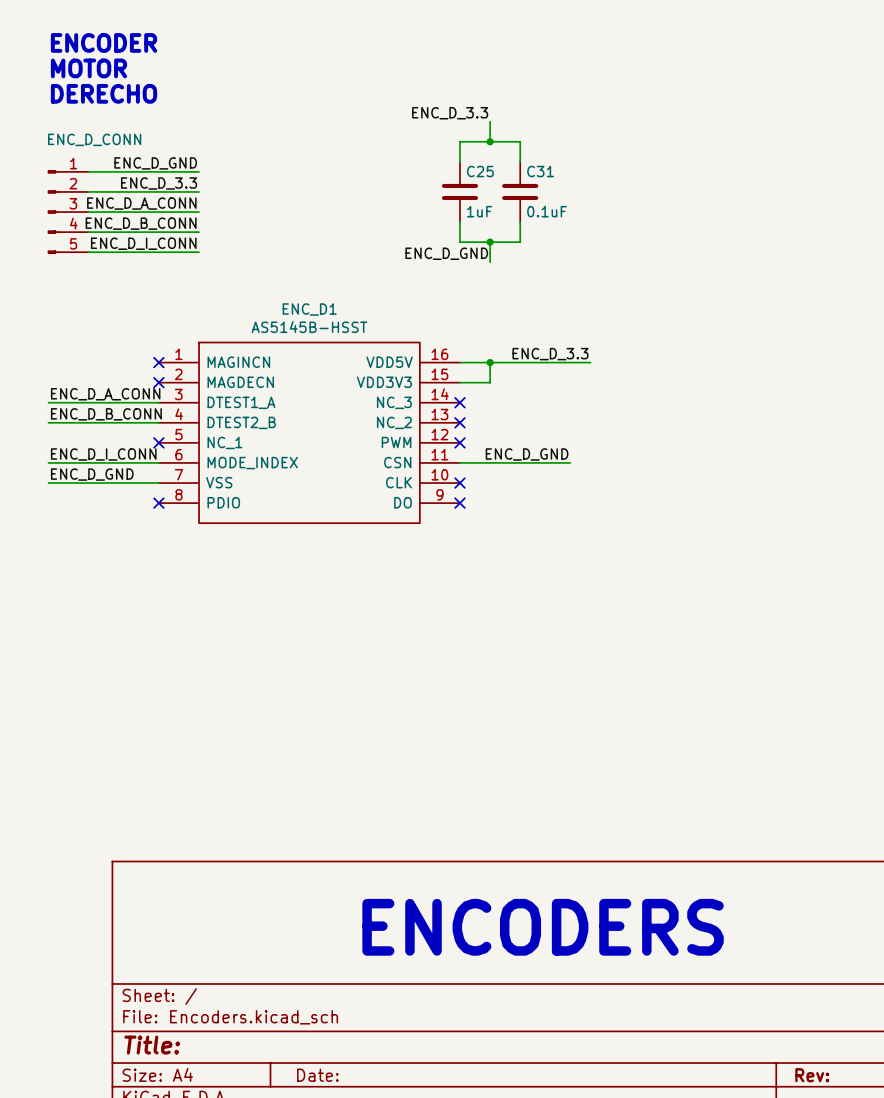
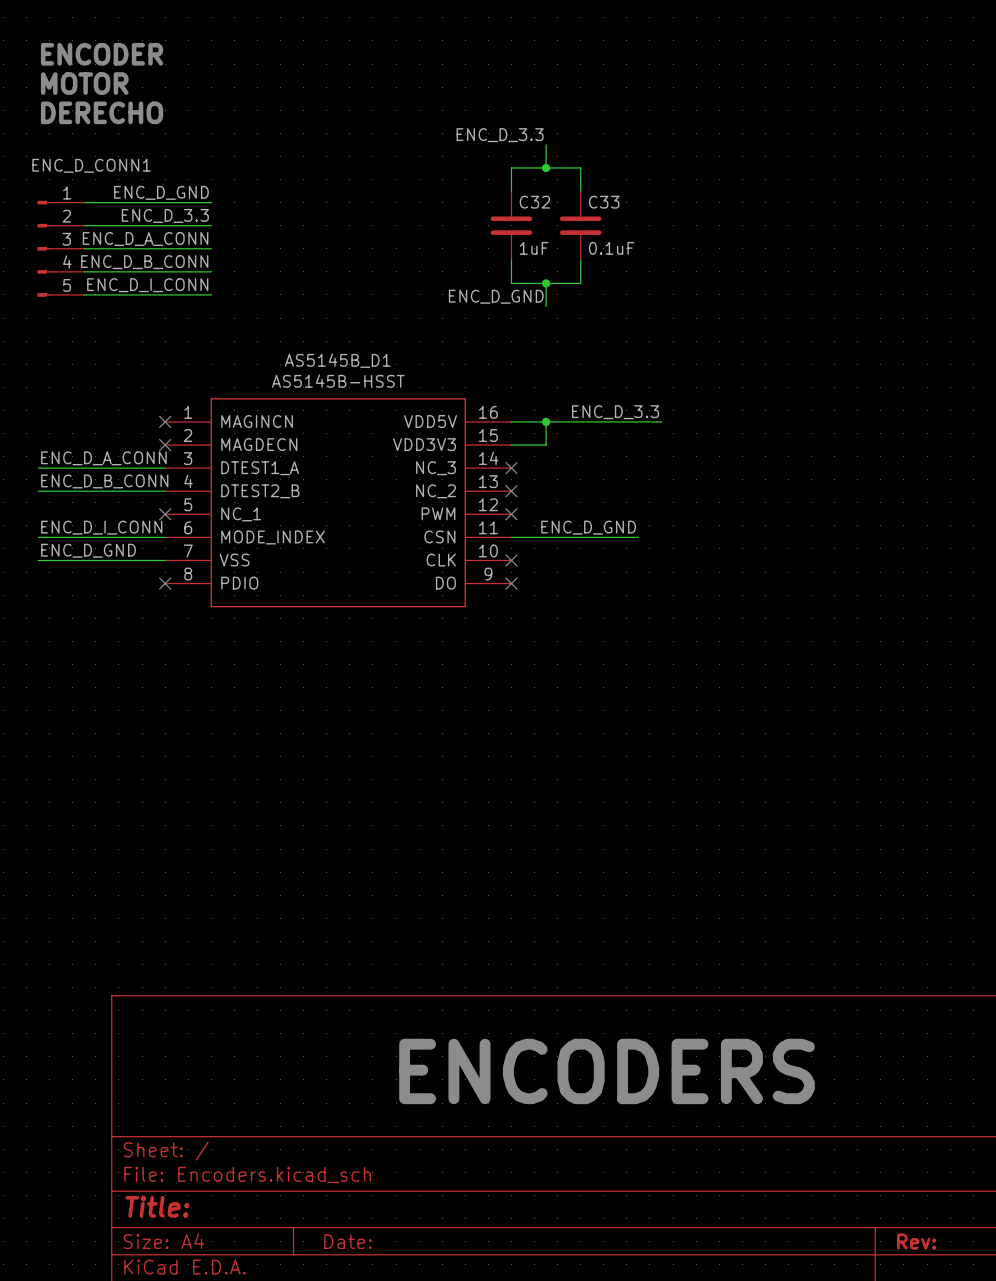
ENC_D_CONN name: ENC_D_CONN (94, 139) -> ENC_D_CONN1 (91, 165)
C25 name: C25 (480, 171) -> C32 (534, 202)
C31 name: C31 (540, 171) -> C33 (604, 202)
ENC_D1 name: ENC_D1 (309, 309) -> AS5145B_D1 (337, 360)

